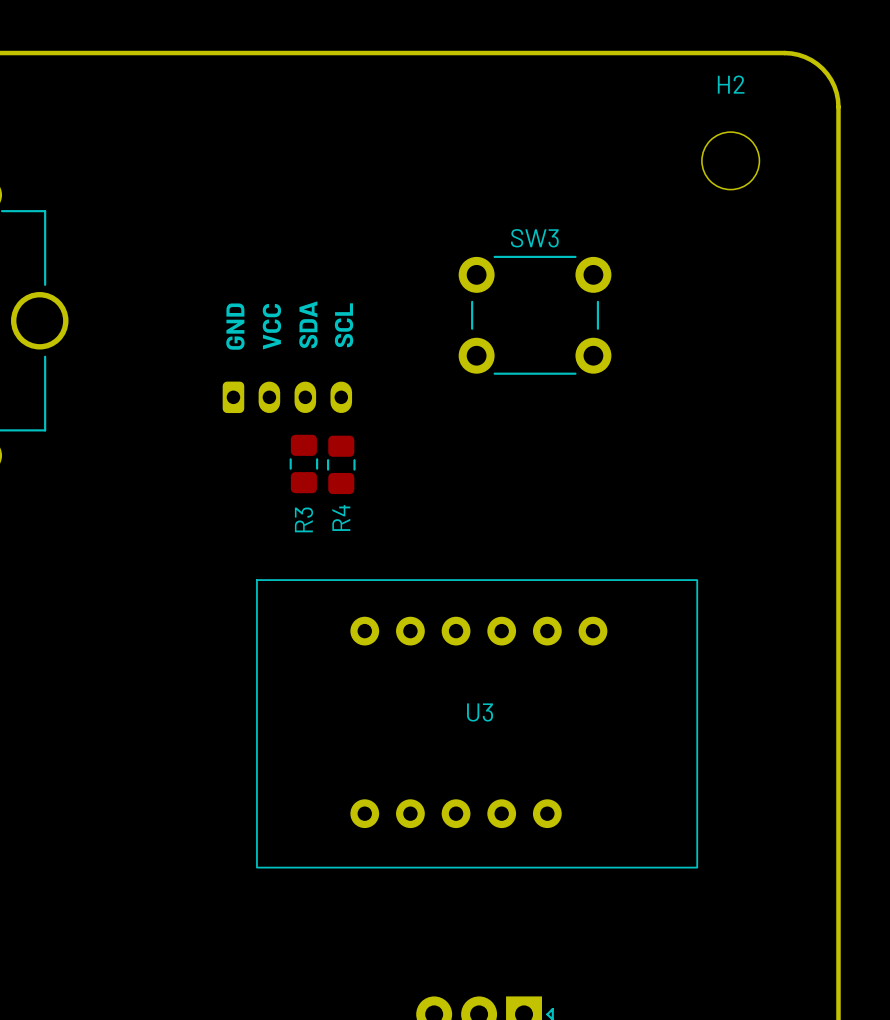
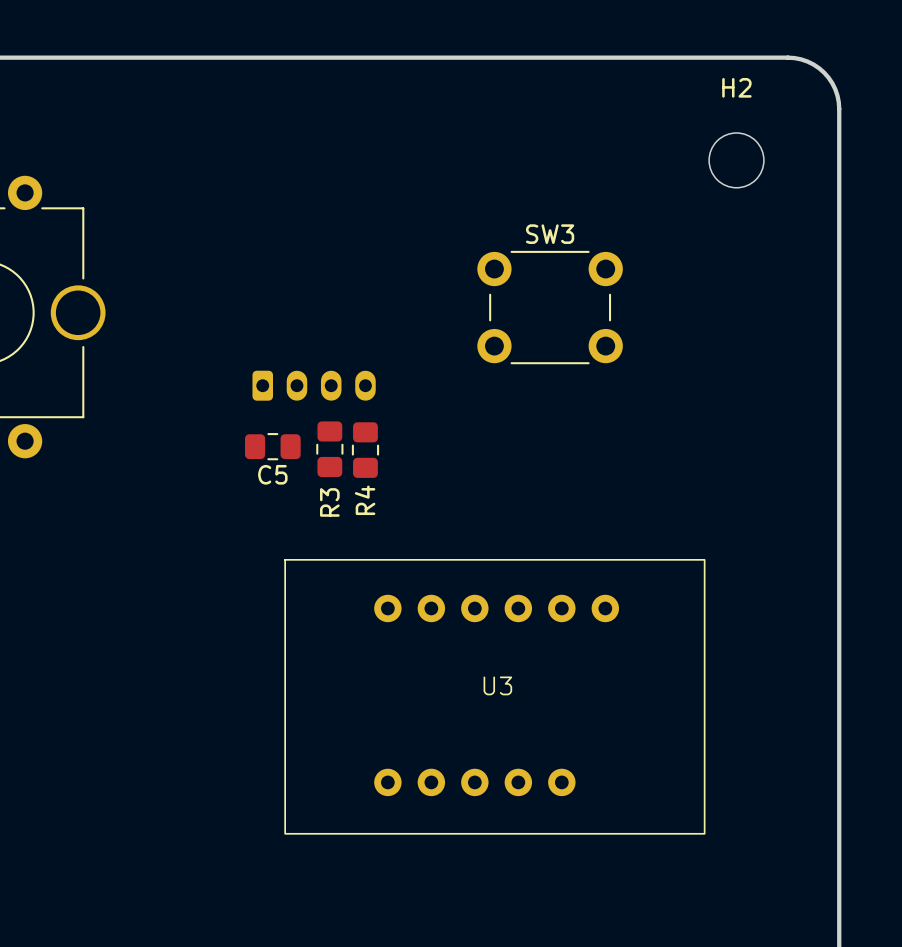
text: SDA (308, 324) -> none
text: SCL (344, 325) -> none
text: GND (235, 326) -> none
text: VCC (271, 326) -> none
C5: none -> (272, 446)

